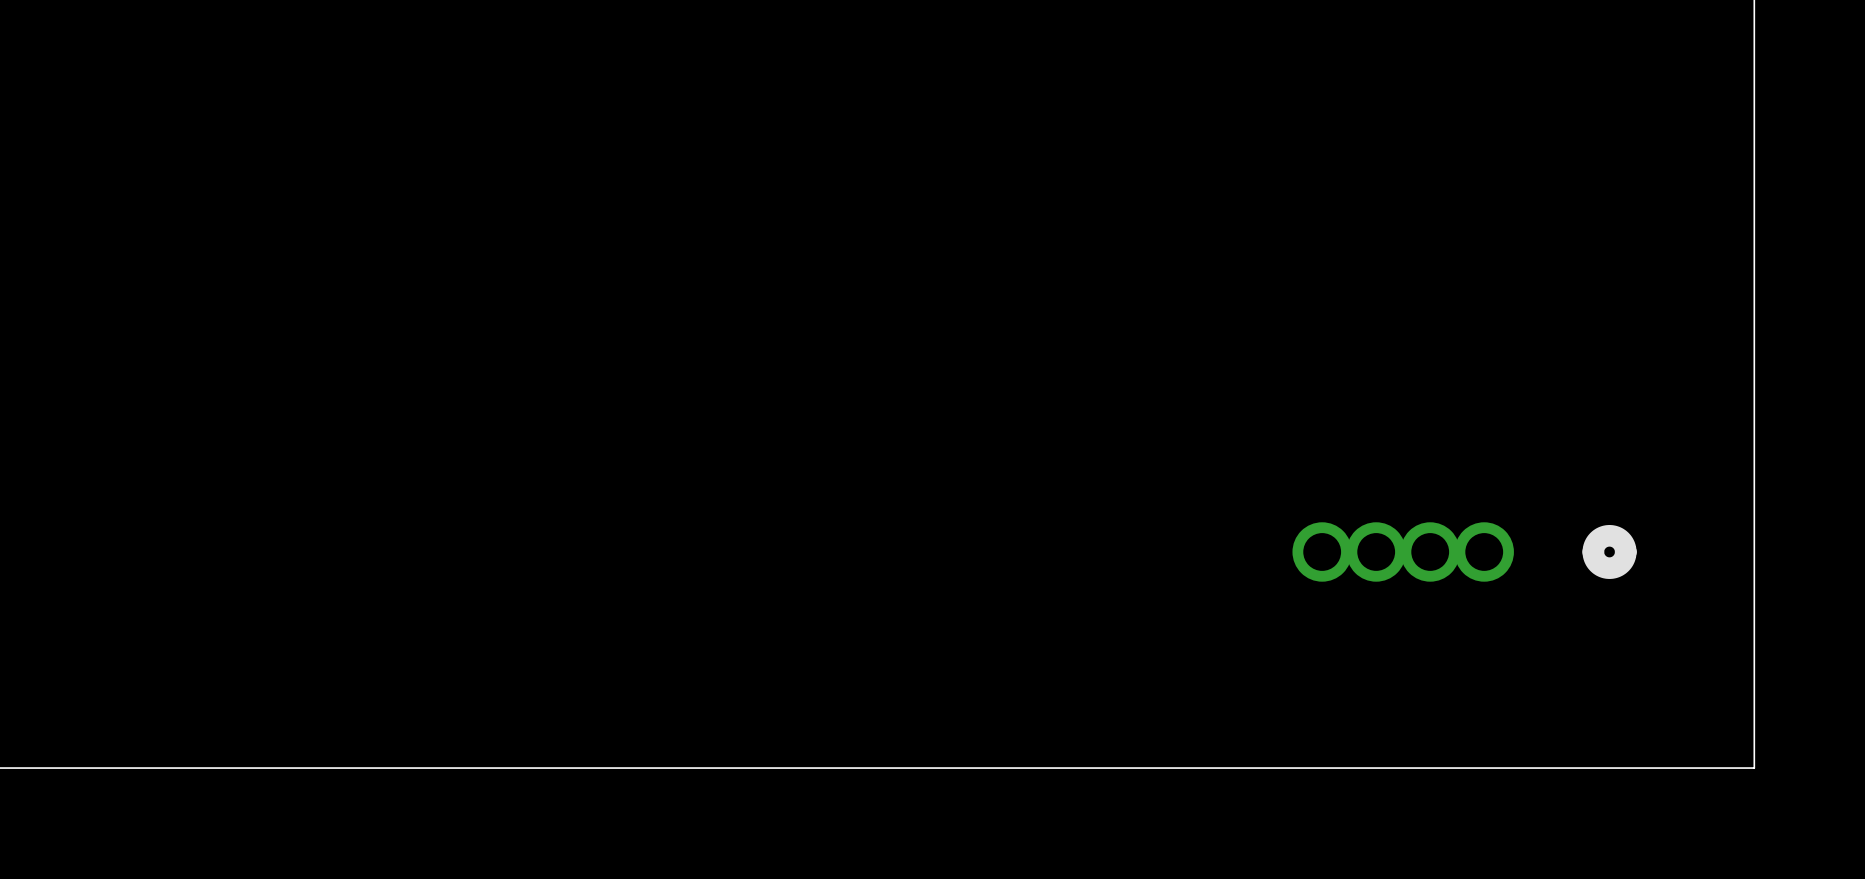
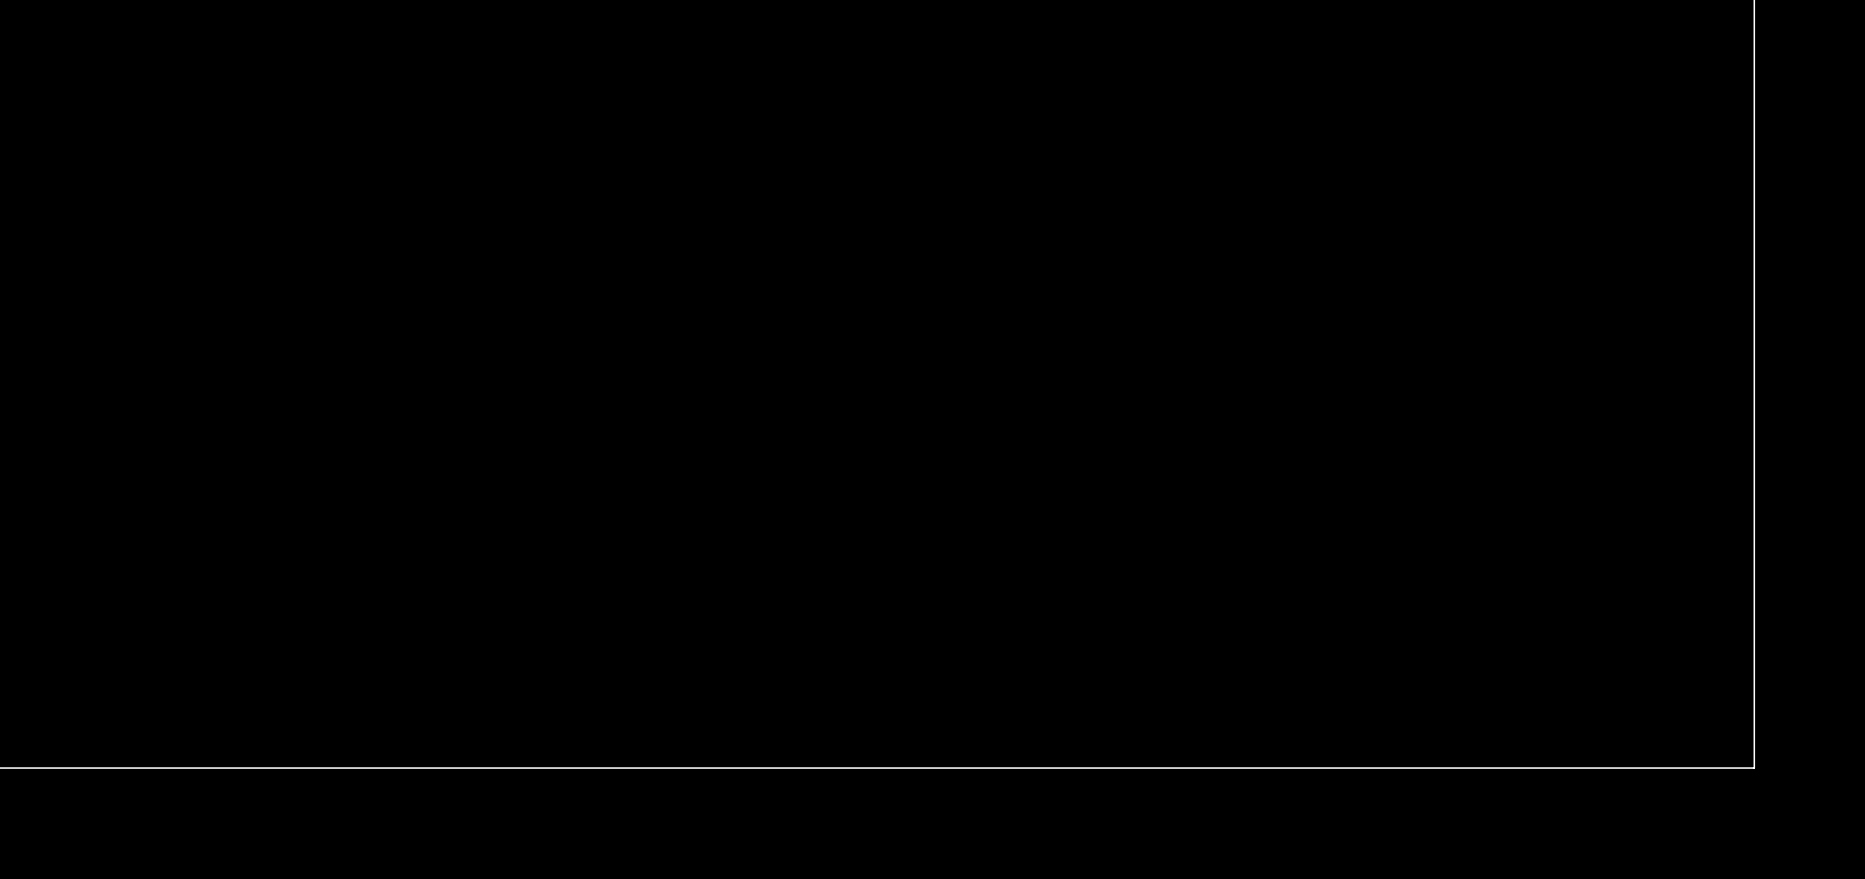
part: (1464, 551) -> none

